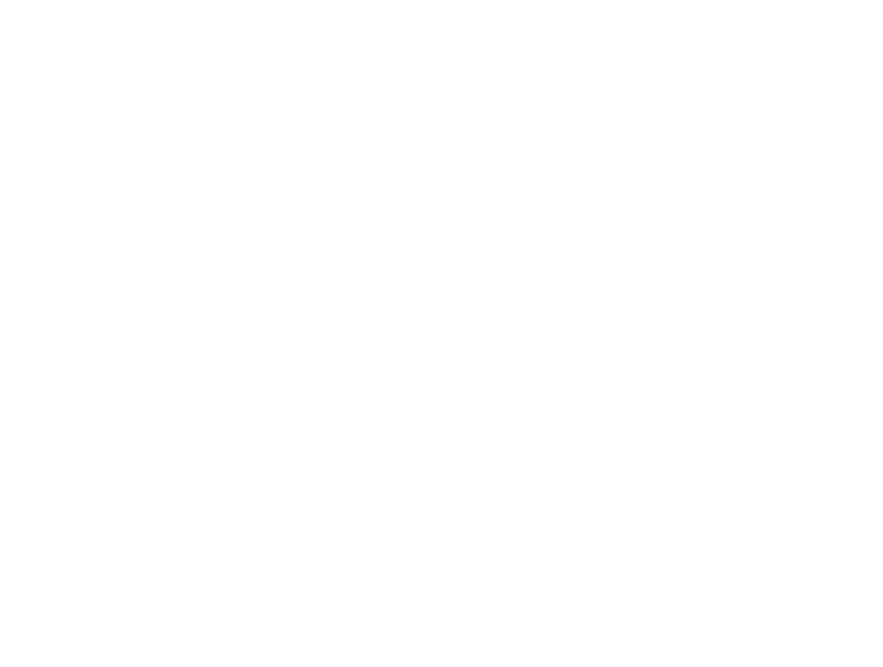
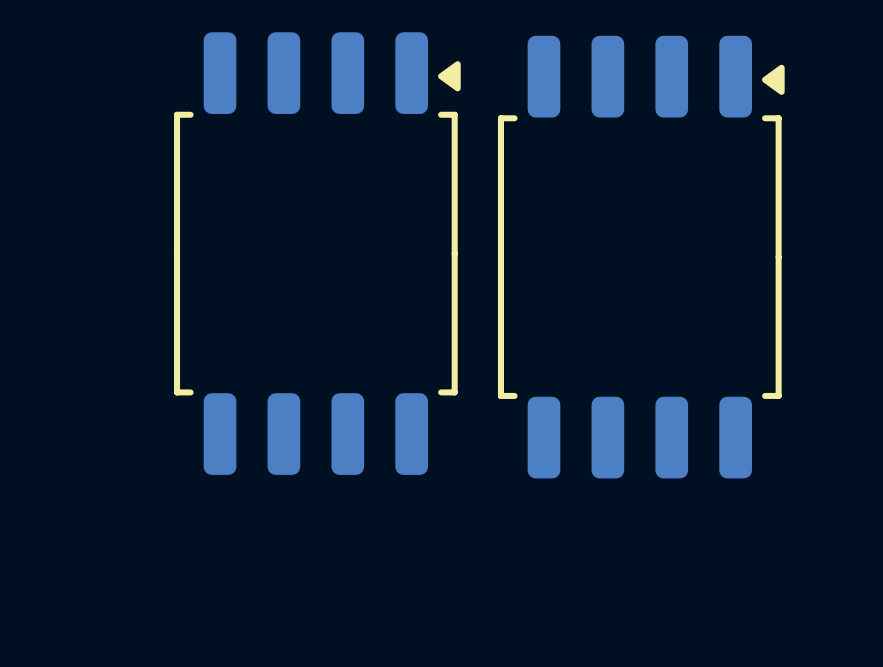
part: none -> (317, 253)
part: none -> (641, 257)

